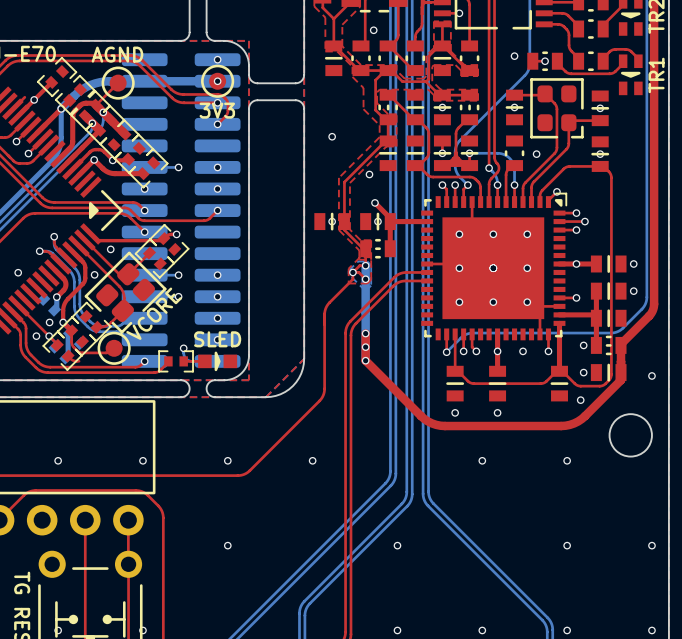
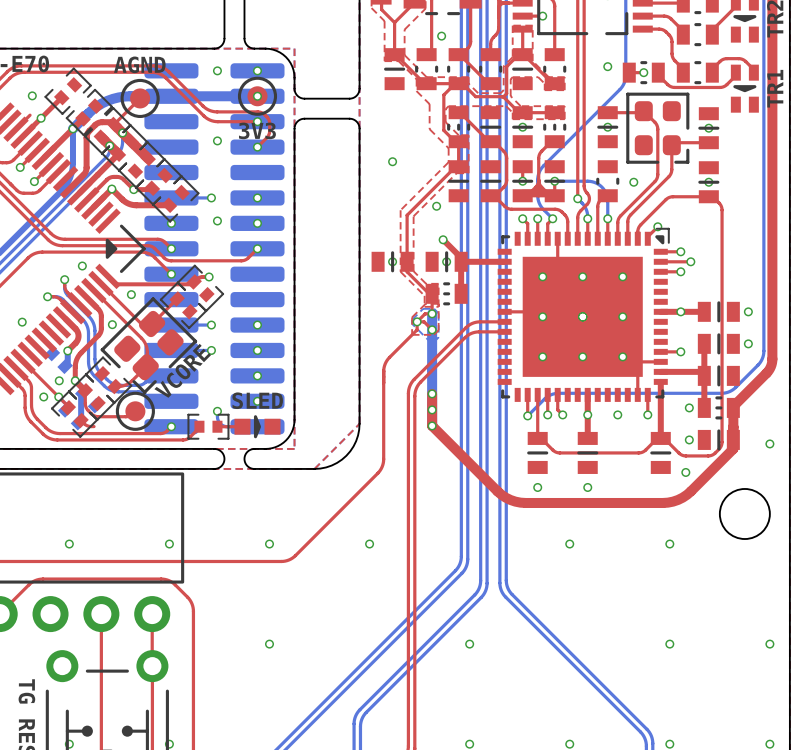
via: none -> (217, 70)
via: none -> (32, 95)
via: none -> (217, 140)
via: none -> (217, 220)
via: none -> (82, 266)

